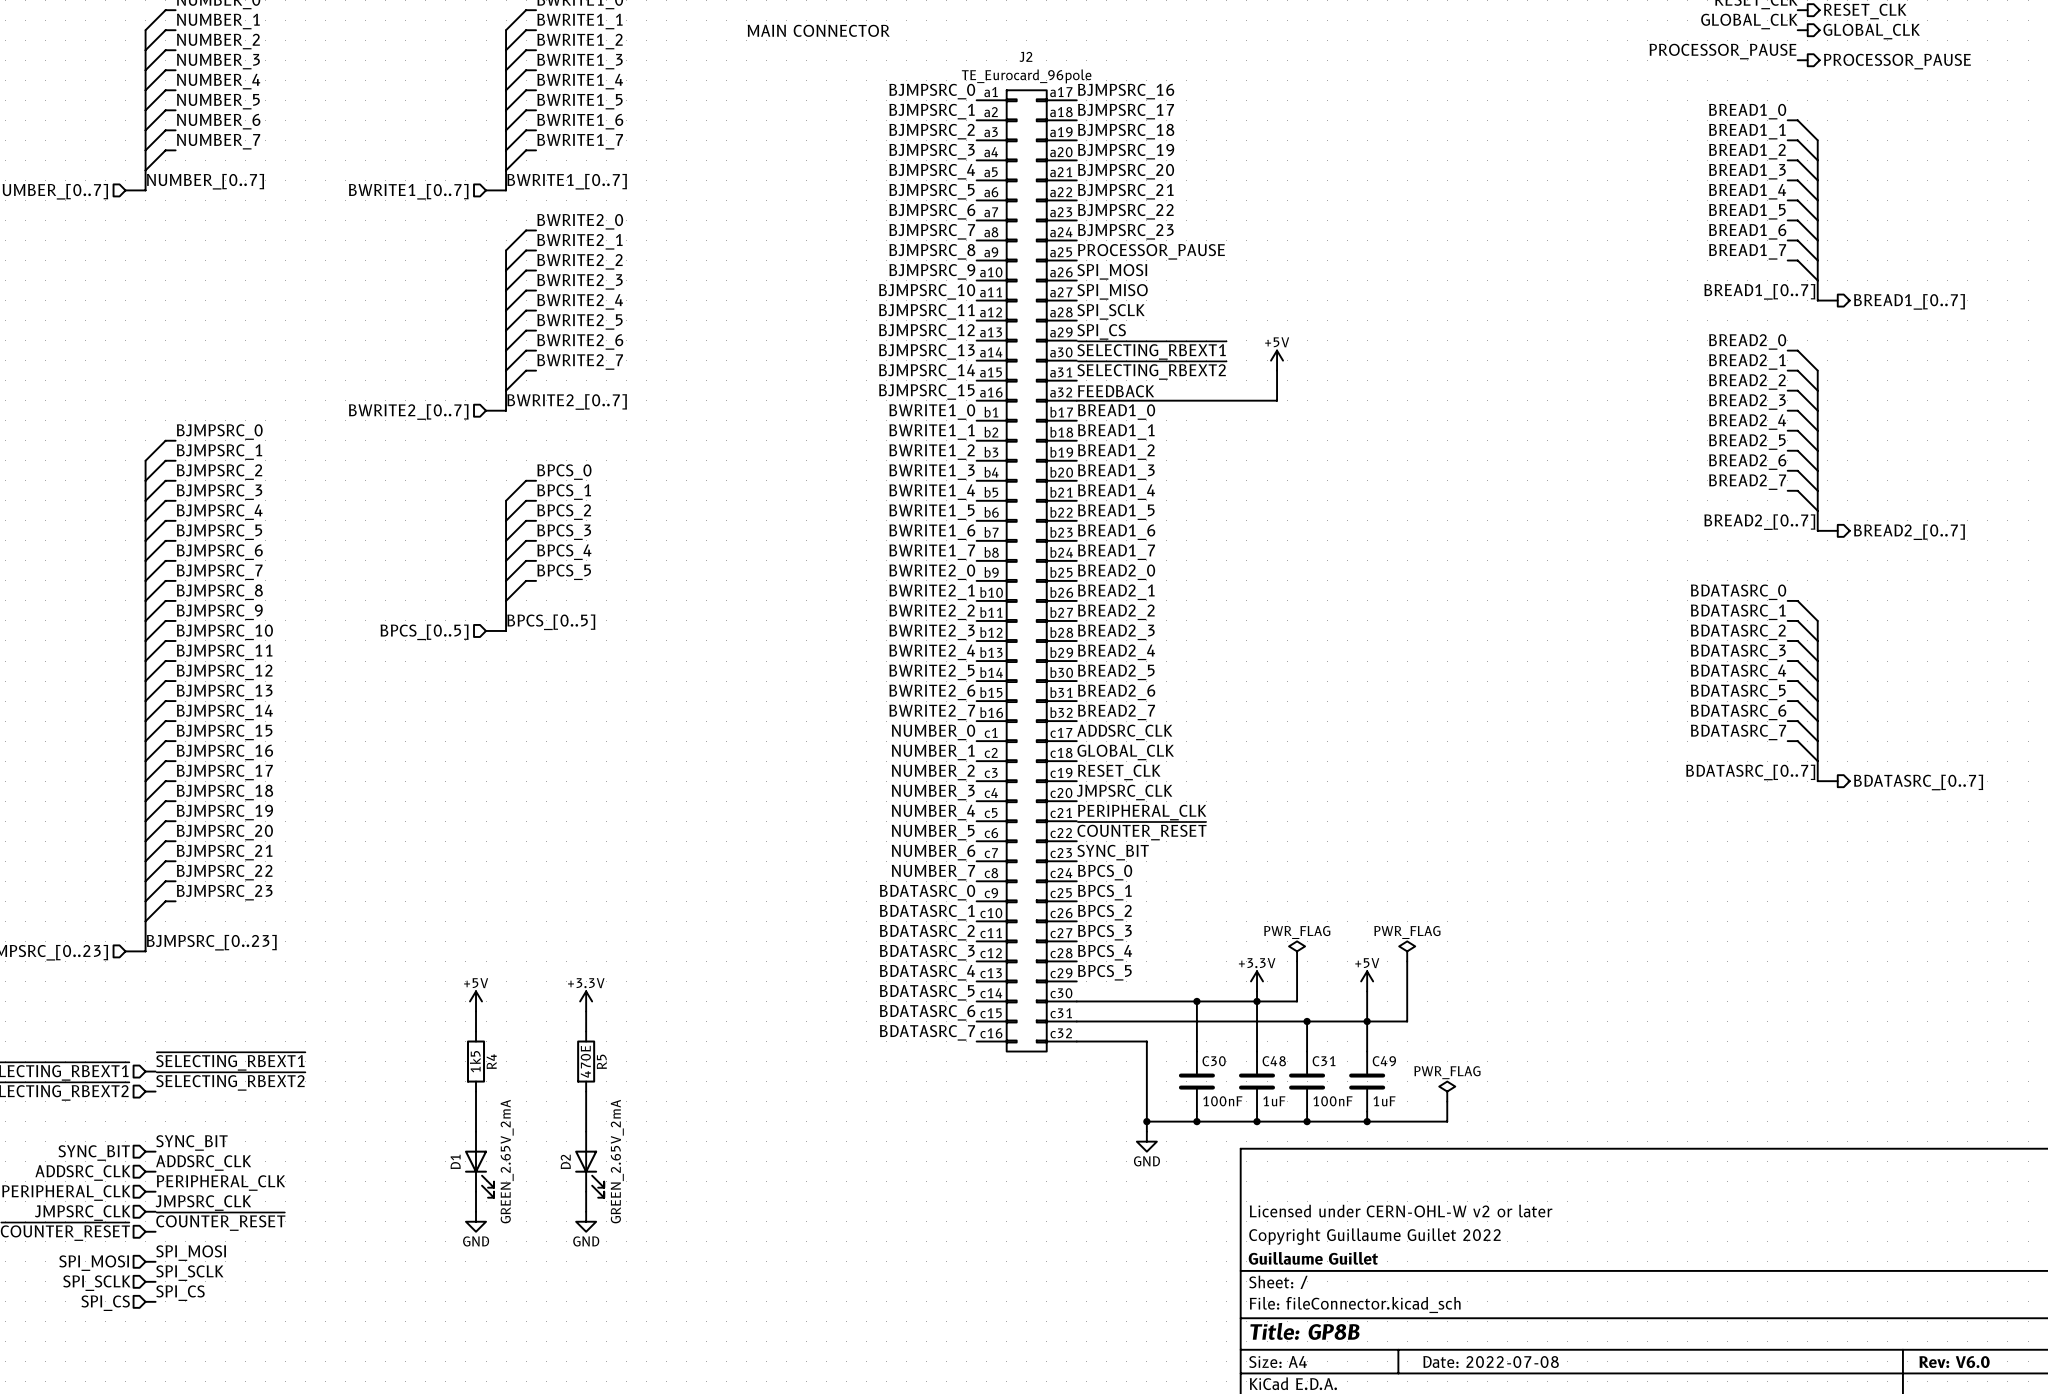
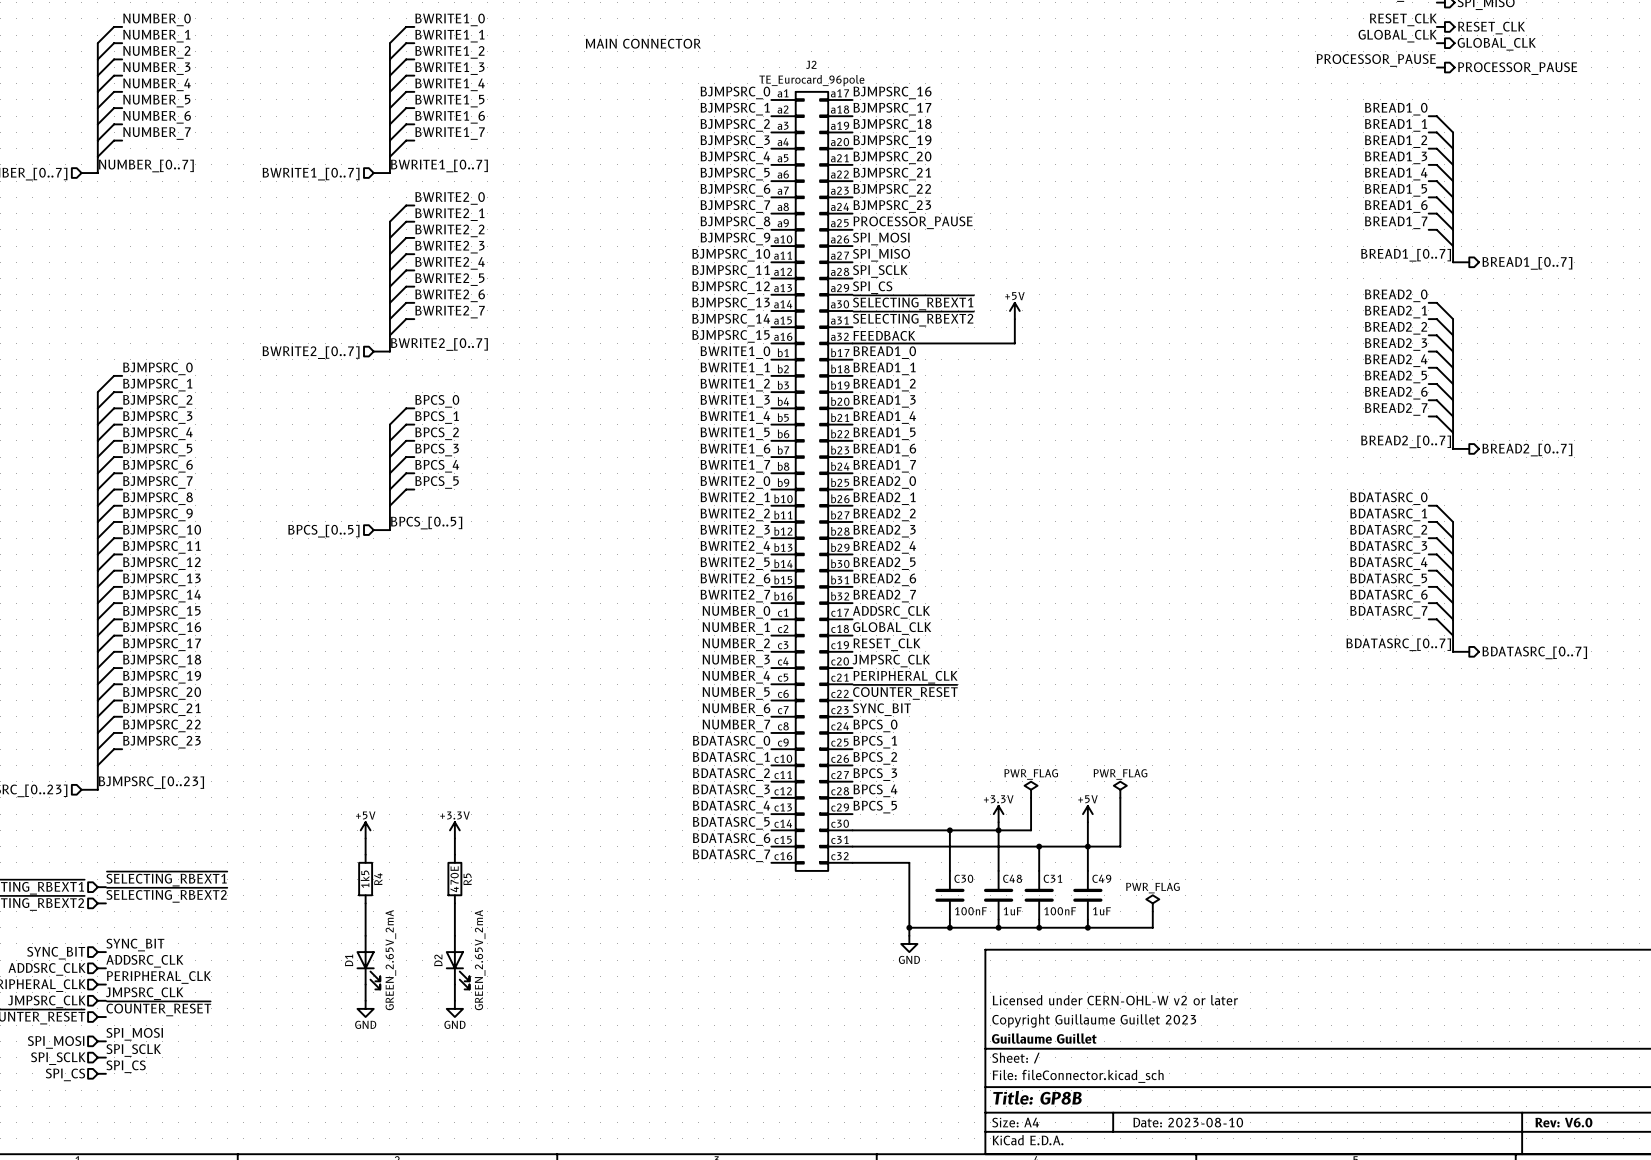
title block: Copyright Guillaume Guillet 2022 (1374, 1236) -> Copyright Guillaume Guillet 2023 (1094, 1020)
title block: Date: 2022-07-08 (1491, 1362) -> Date: 2023-08-10 (1188, 1122)

